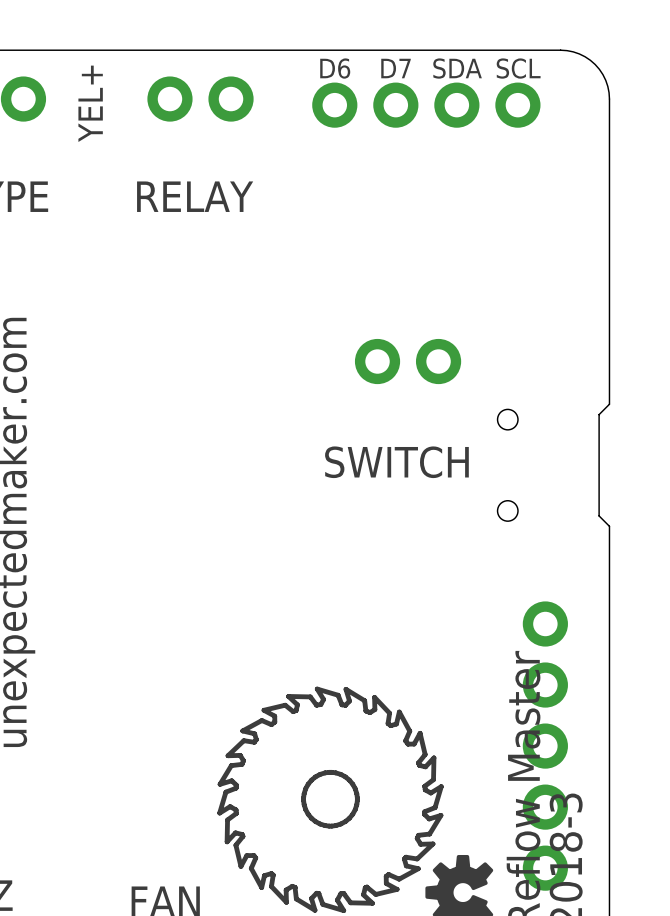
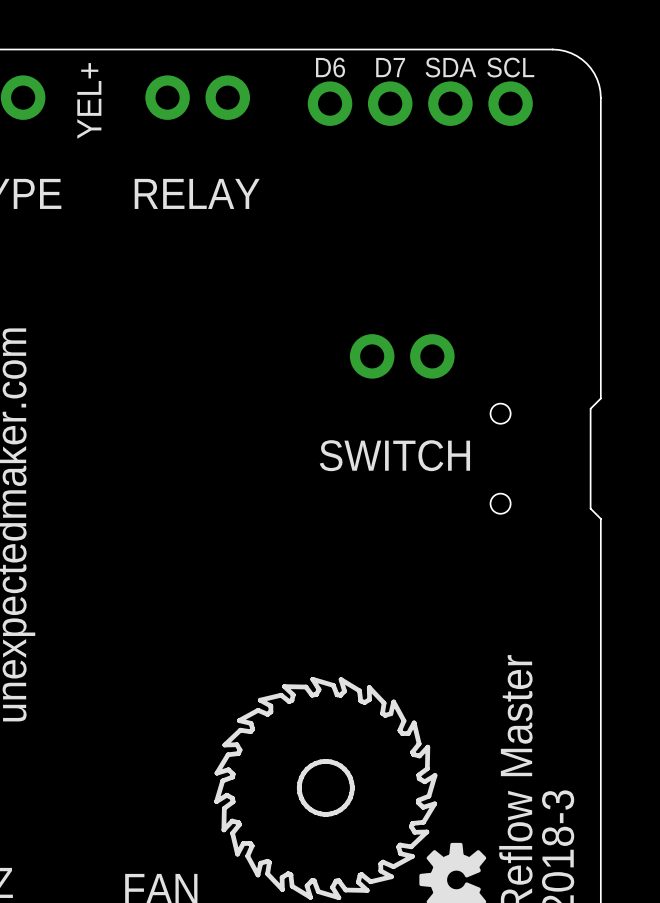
part: (545, 746) -> none

